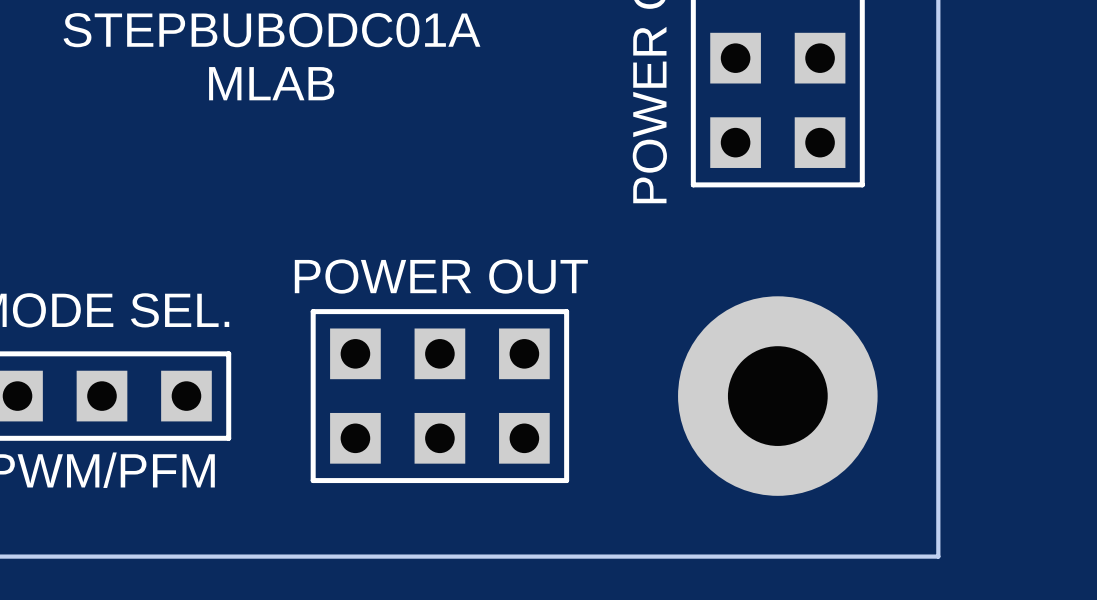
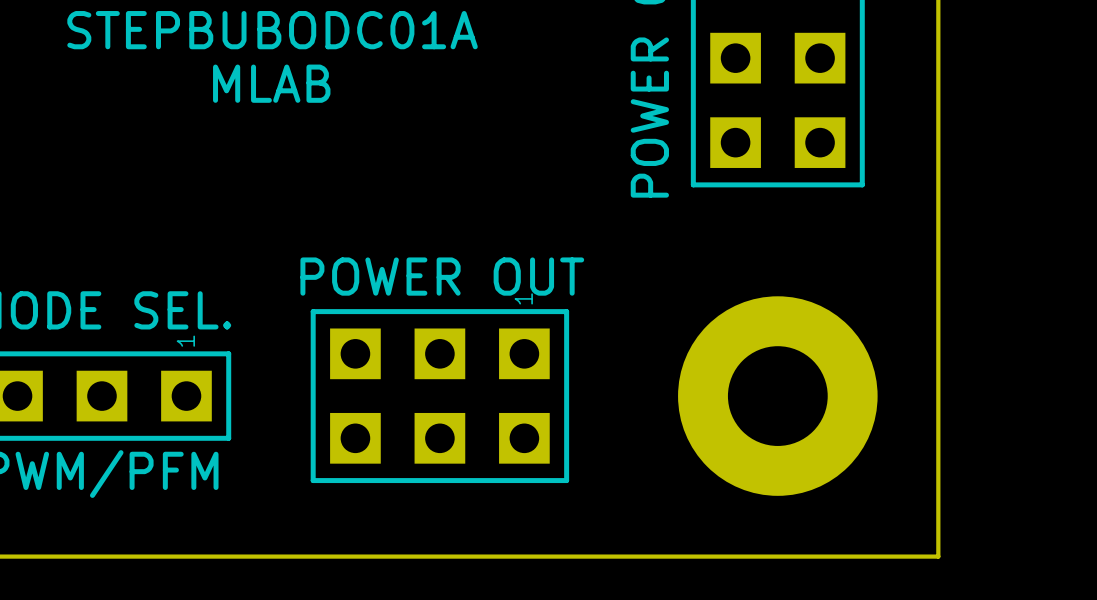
part text: none -> 1 (523, 298)
part text: none -> 1 (185, 341)

